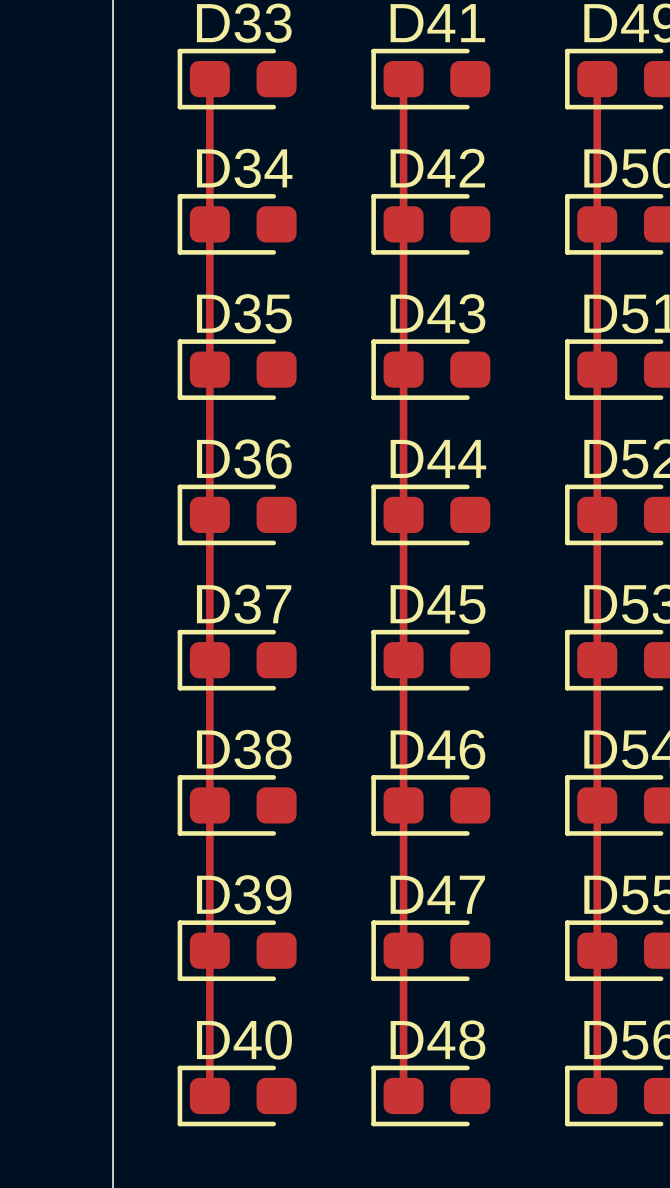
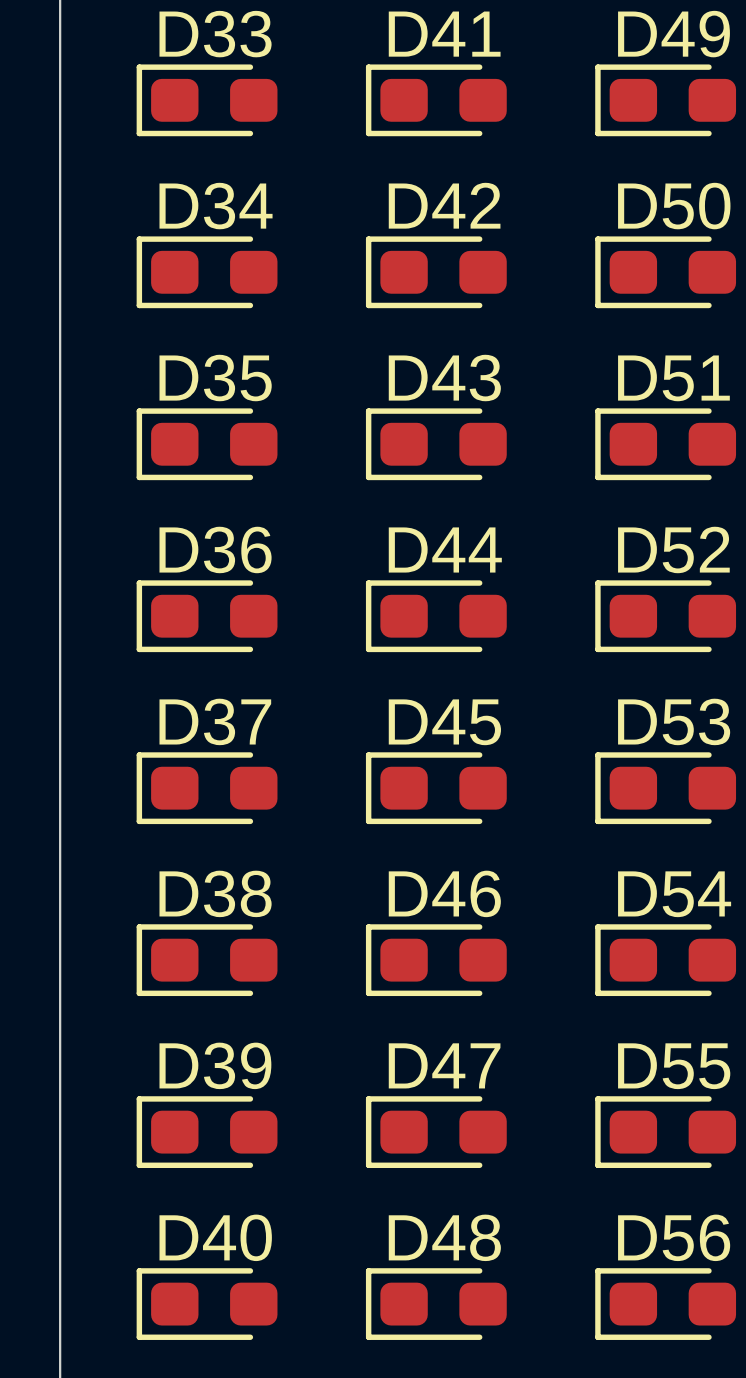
track: (209, 79) (209, 1095) -> none
track: (403, 79) (403, 1095) -> none
track: (597, 79) (597, 1095) -> none

